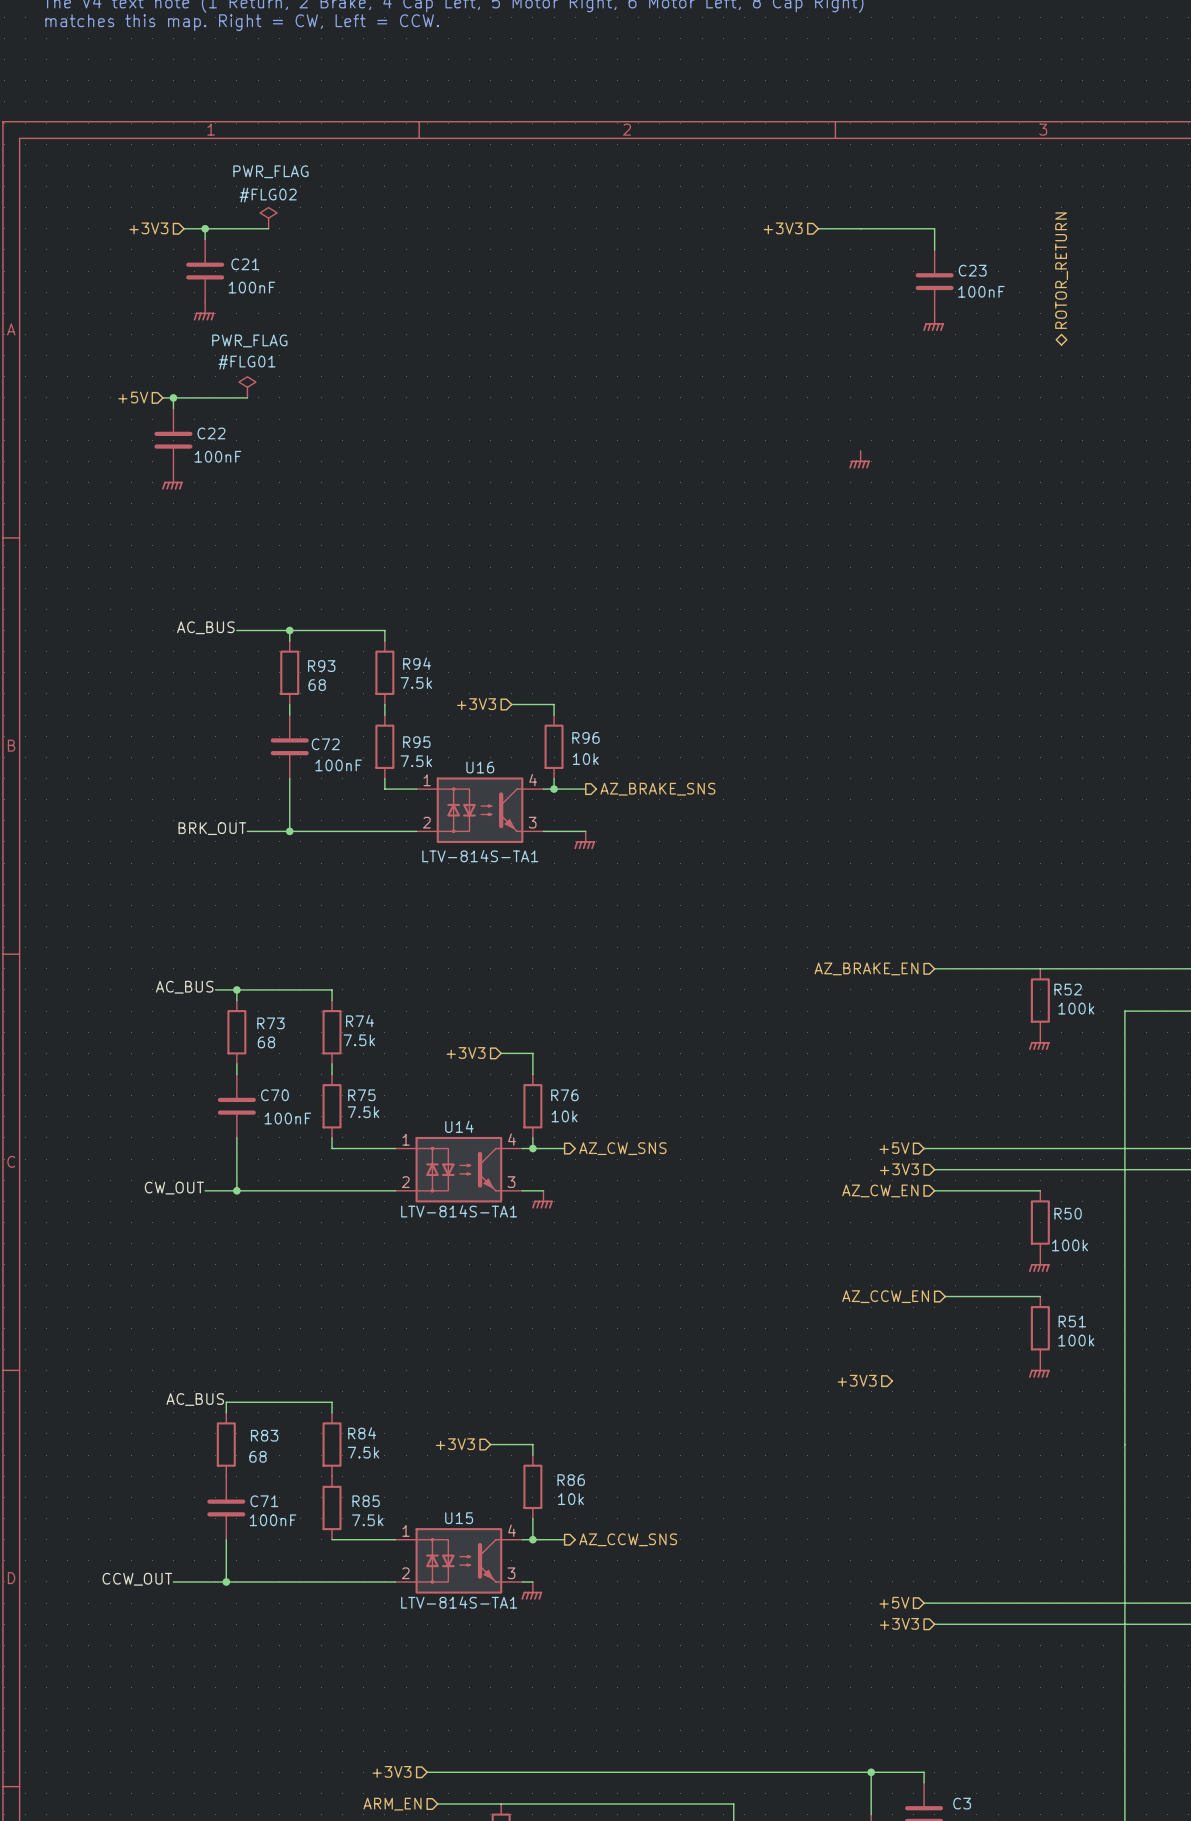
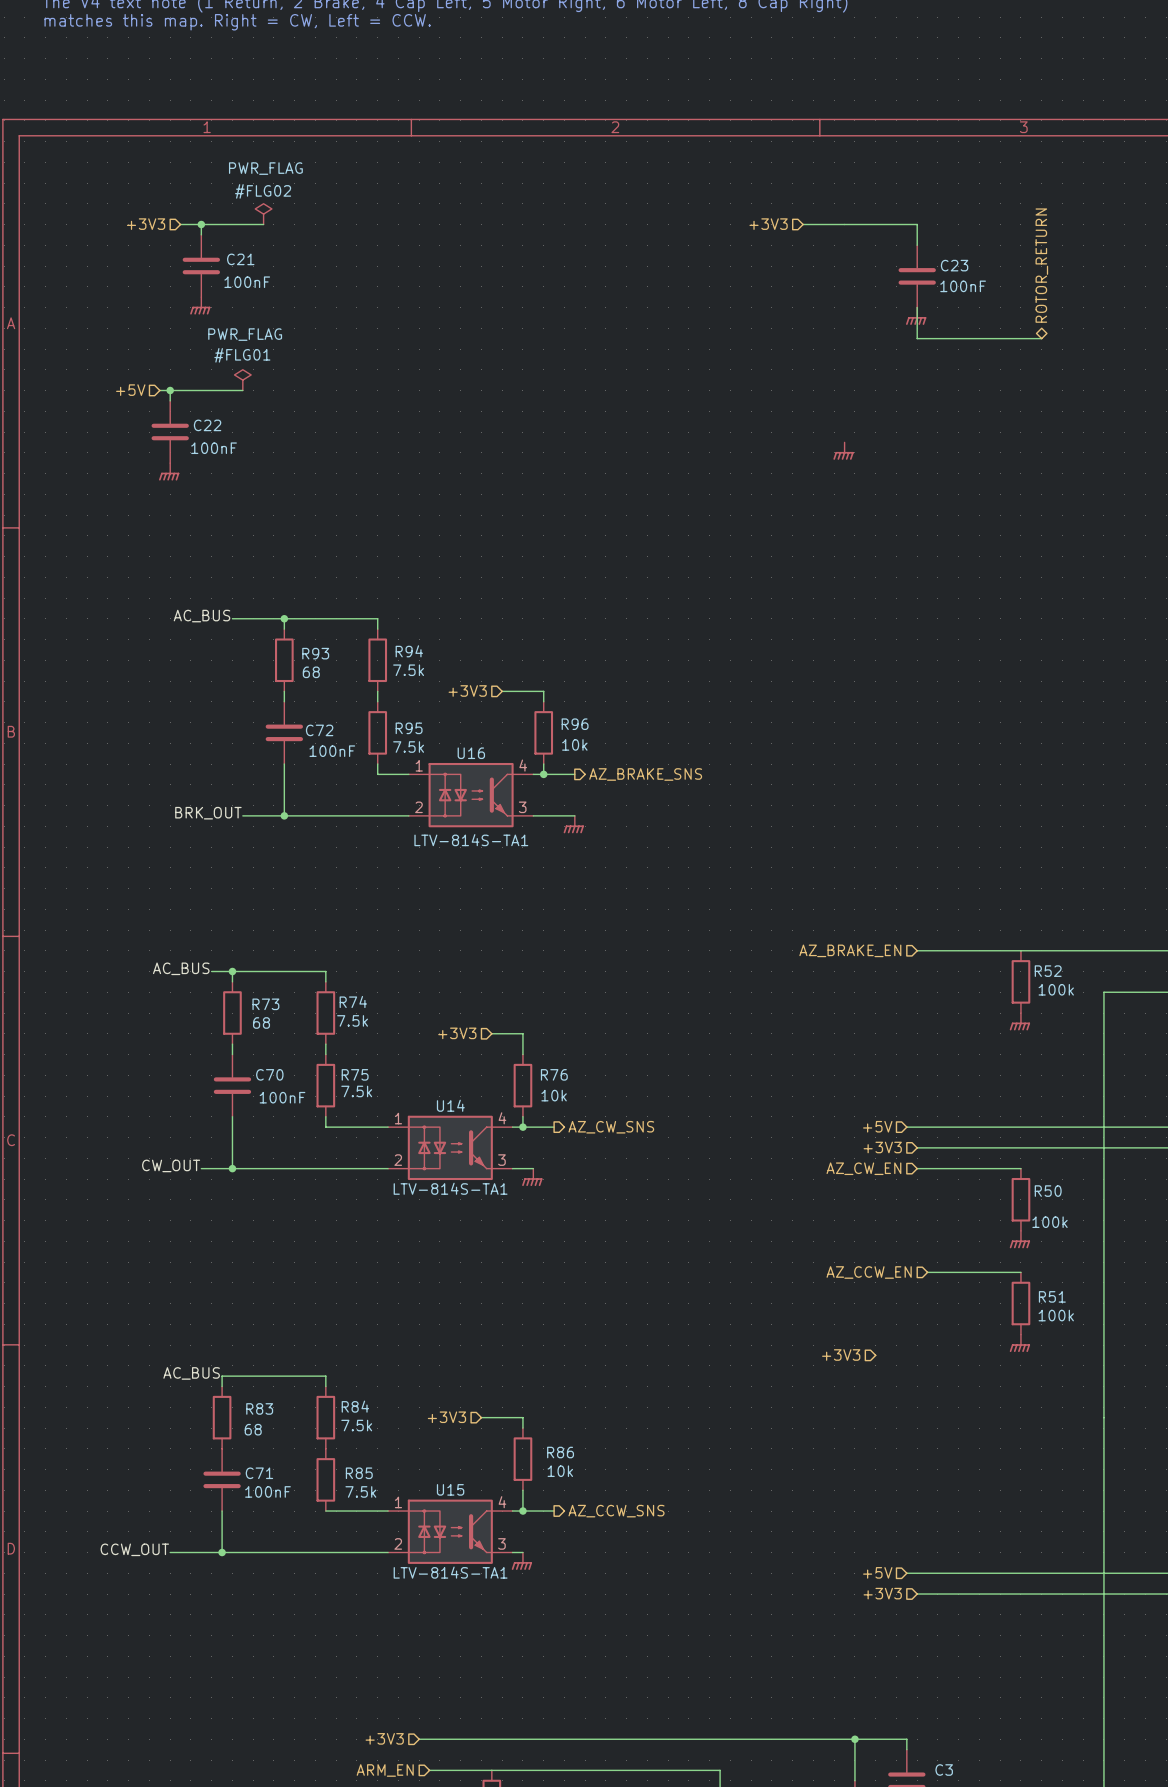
wire: none -> (917, 307) (917, 338) (1041, 338)

